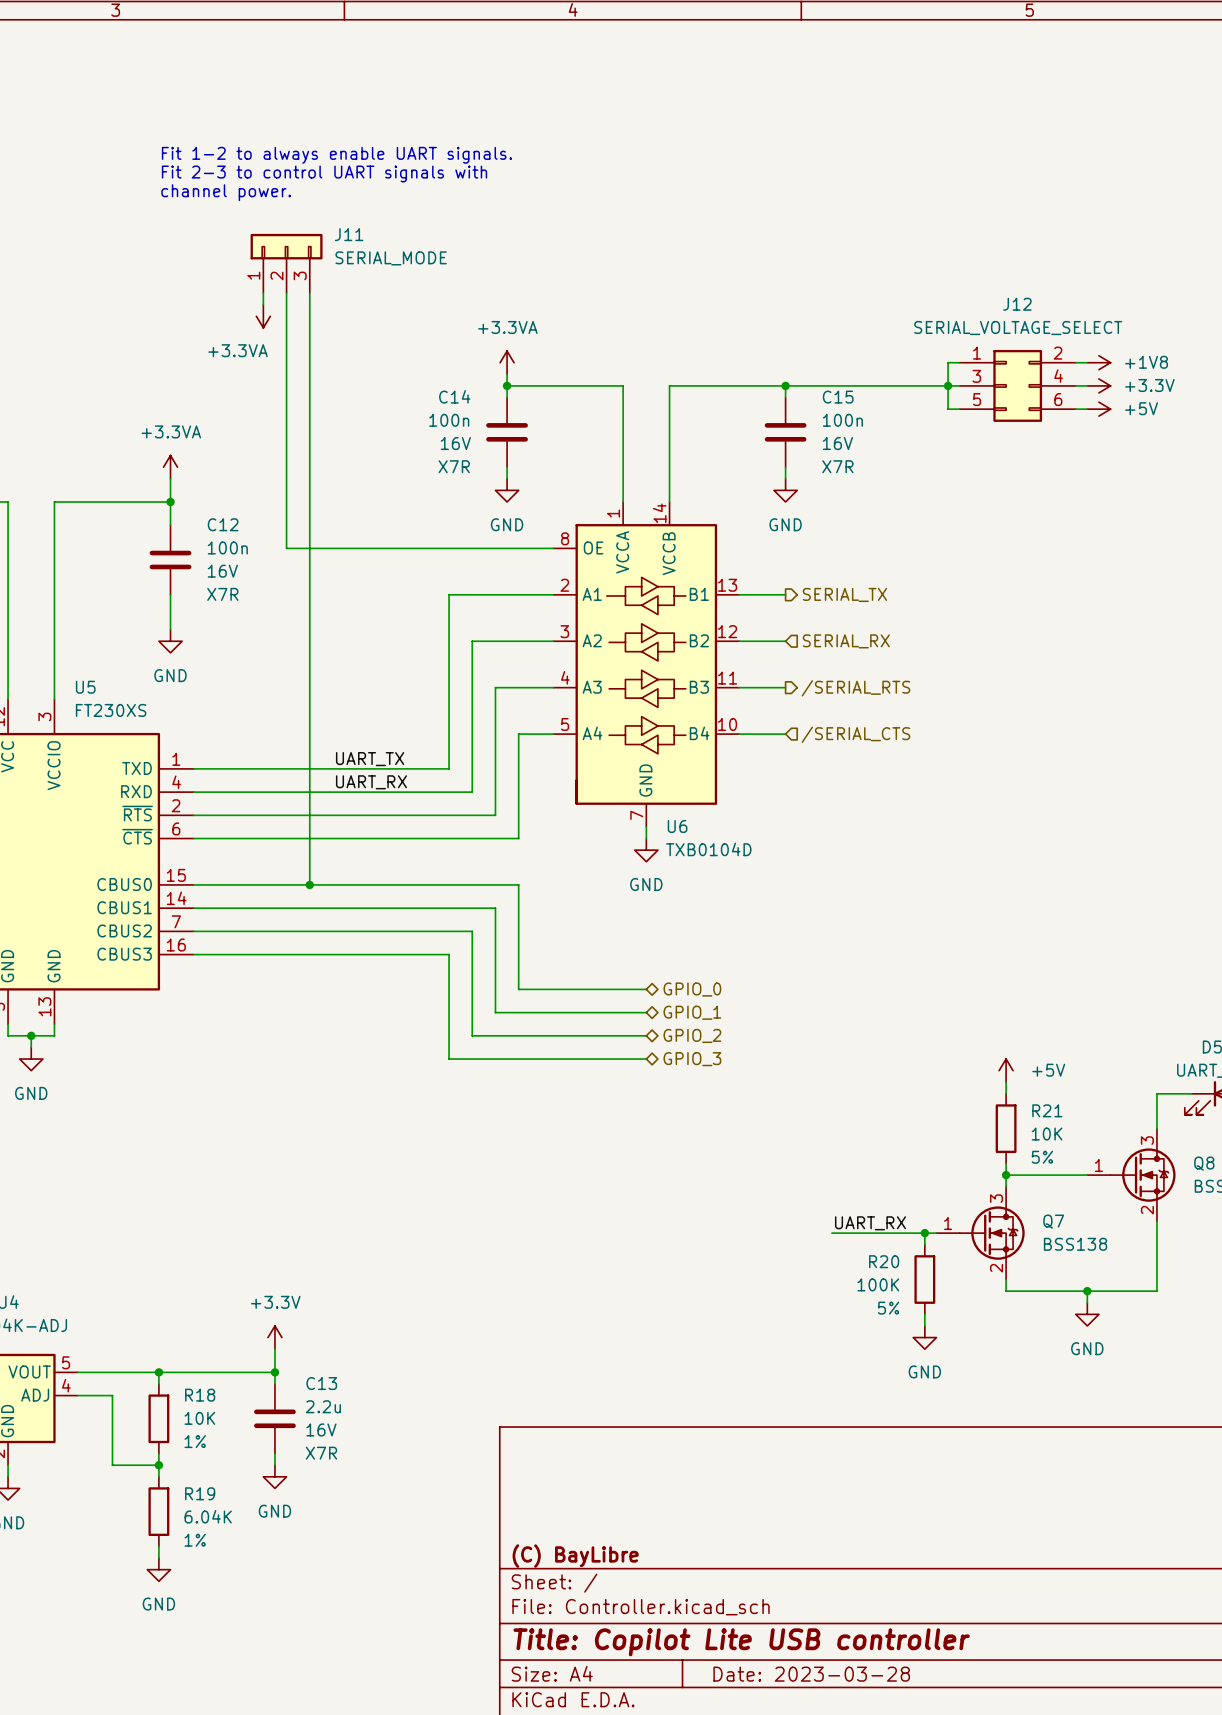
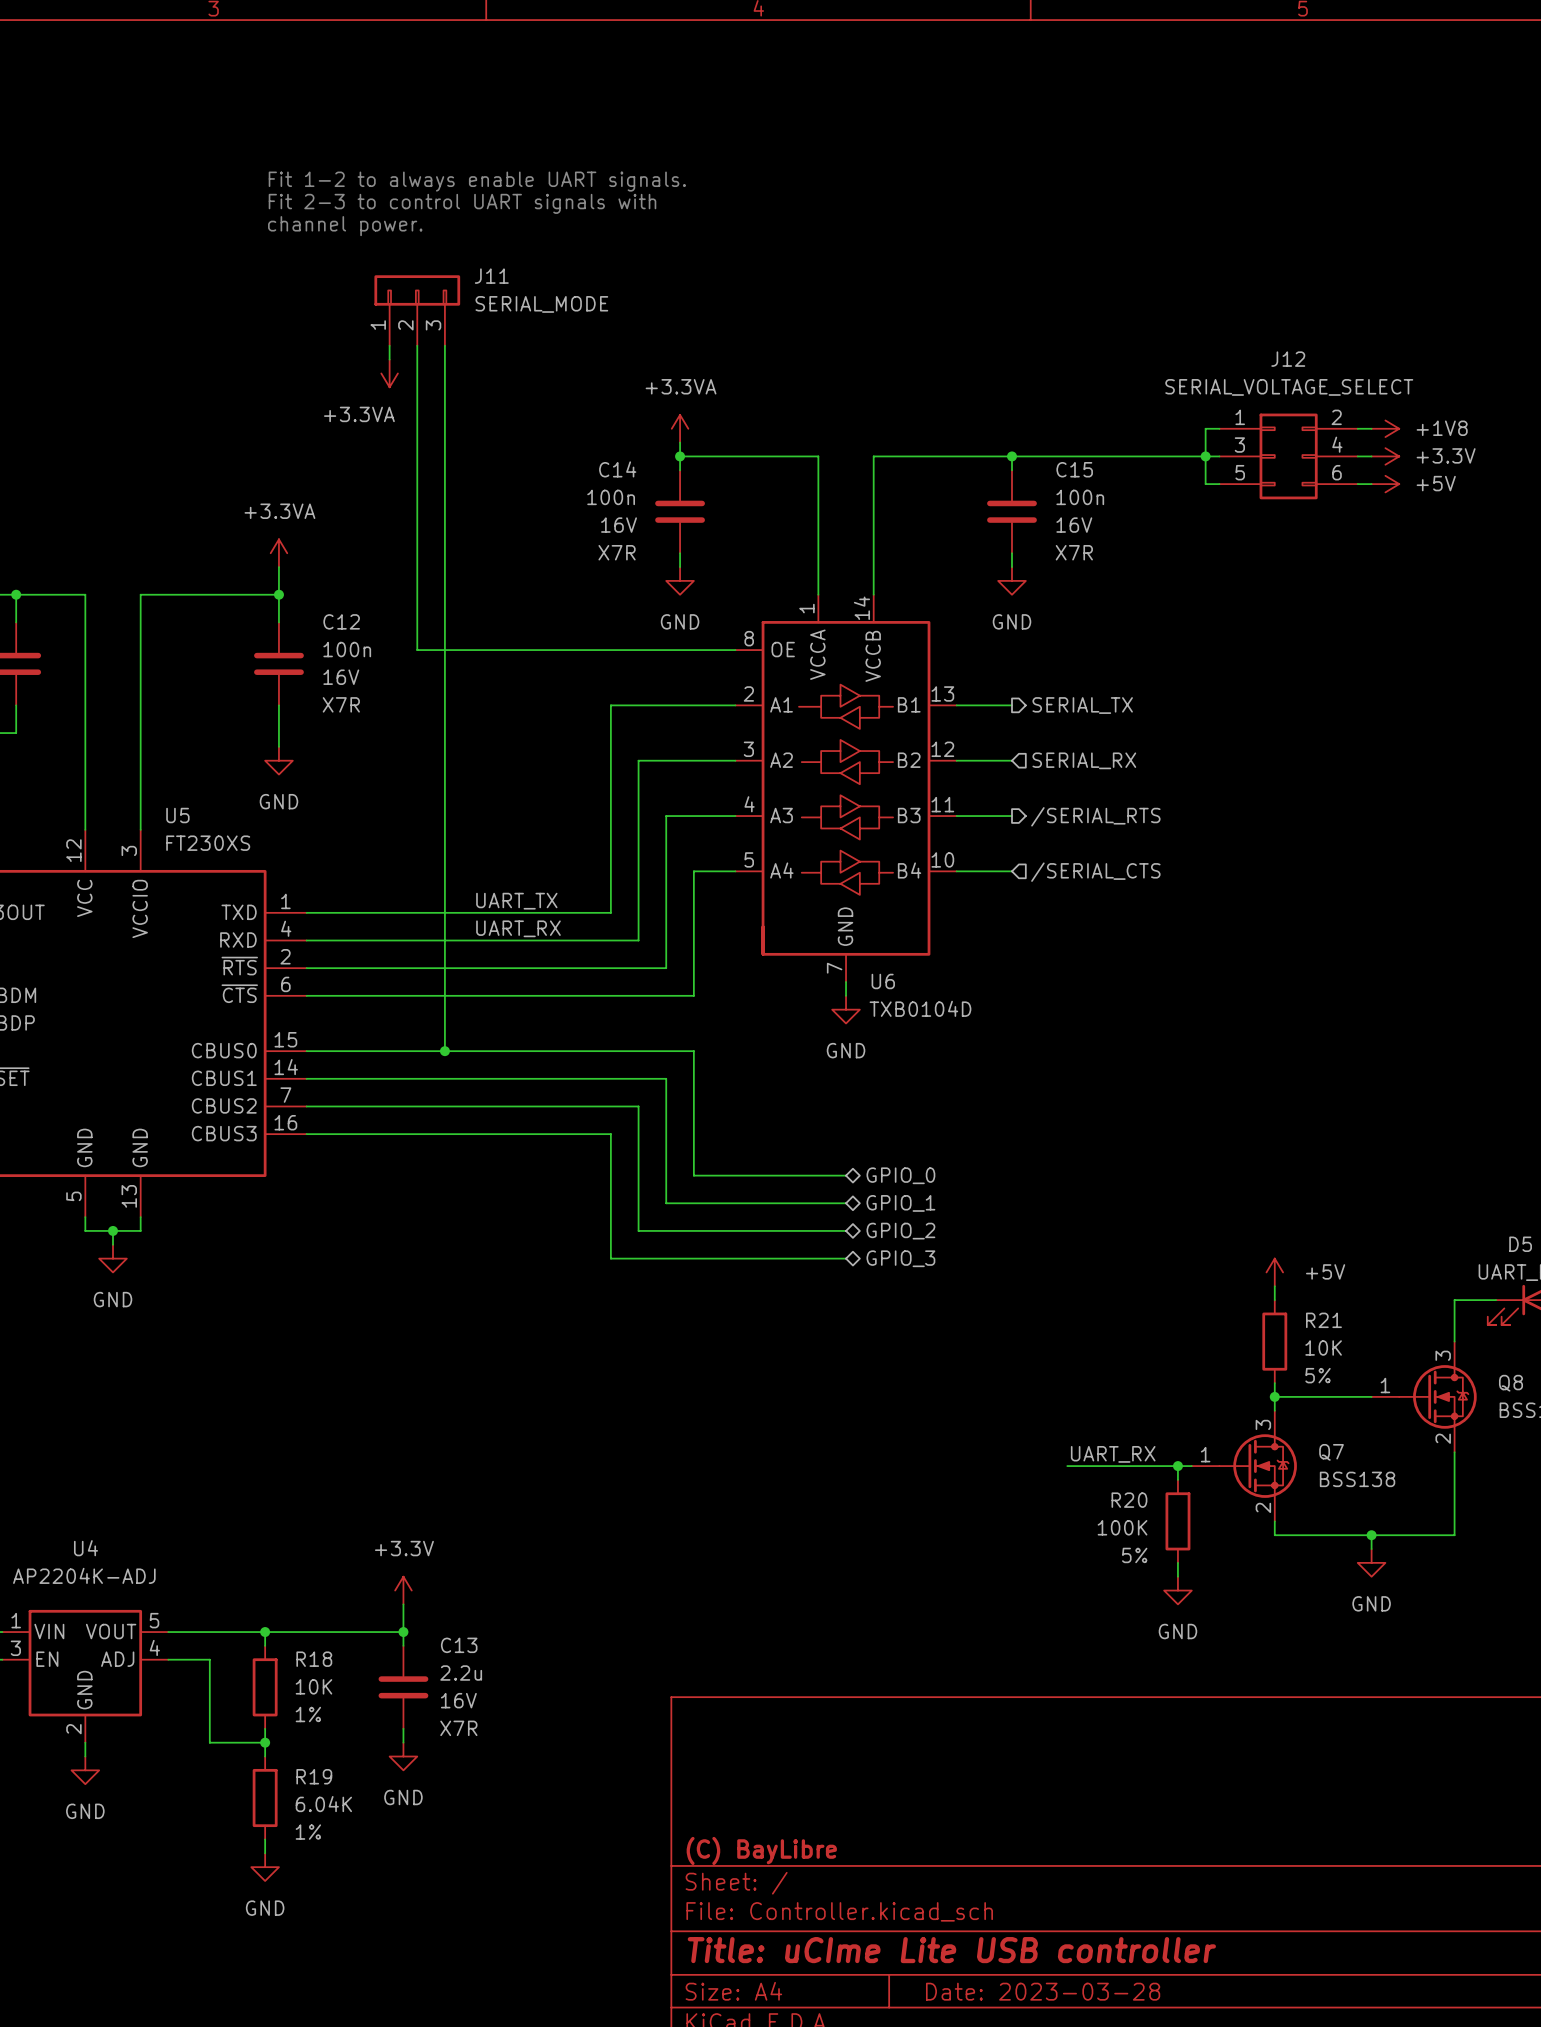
title block: Title: Copilot Lite USB controller (741, 1642) -> Title: uCIme Lite USB controller (951, 1950)

